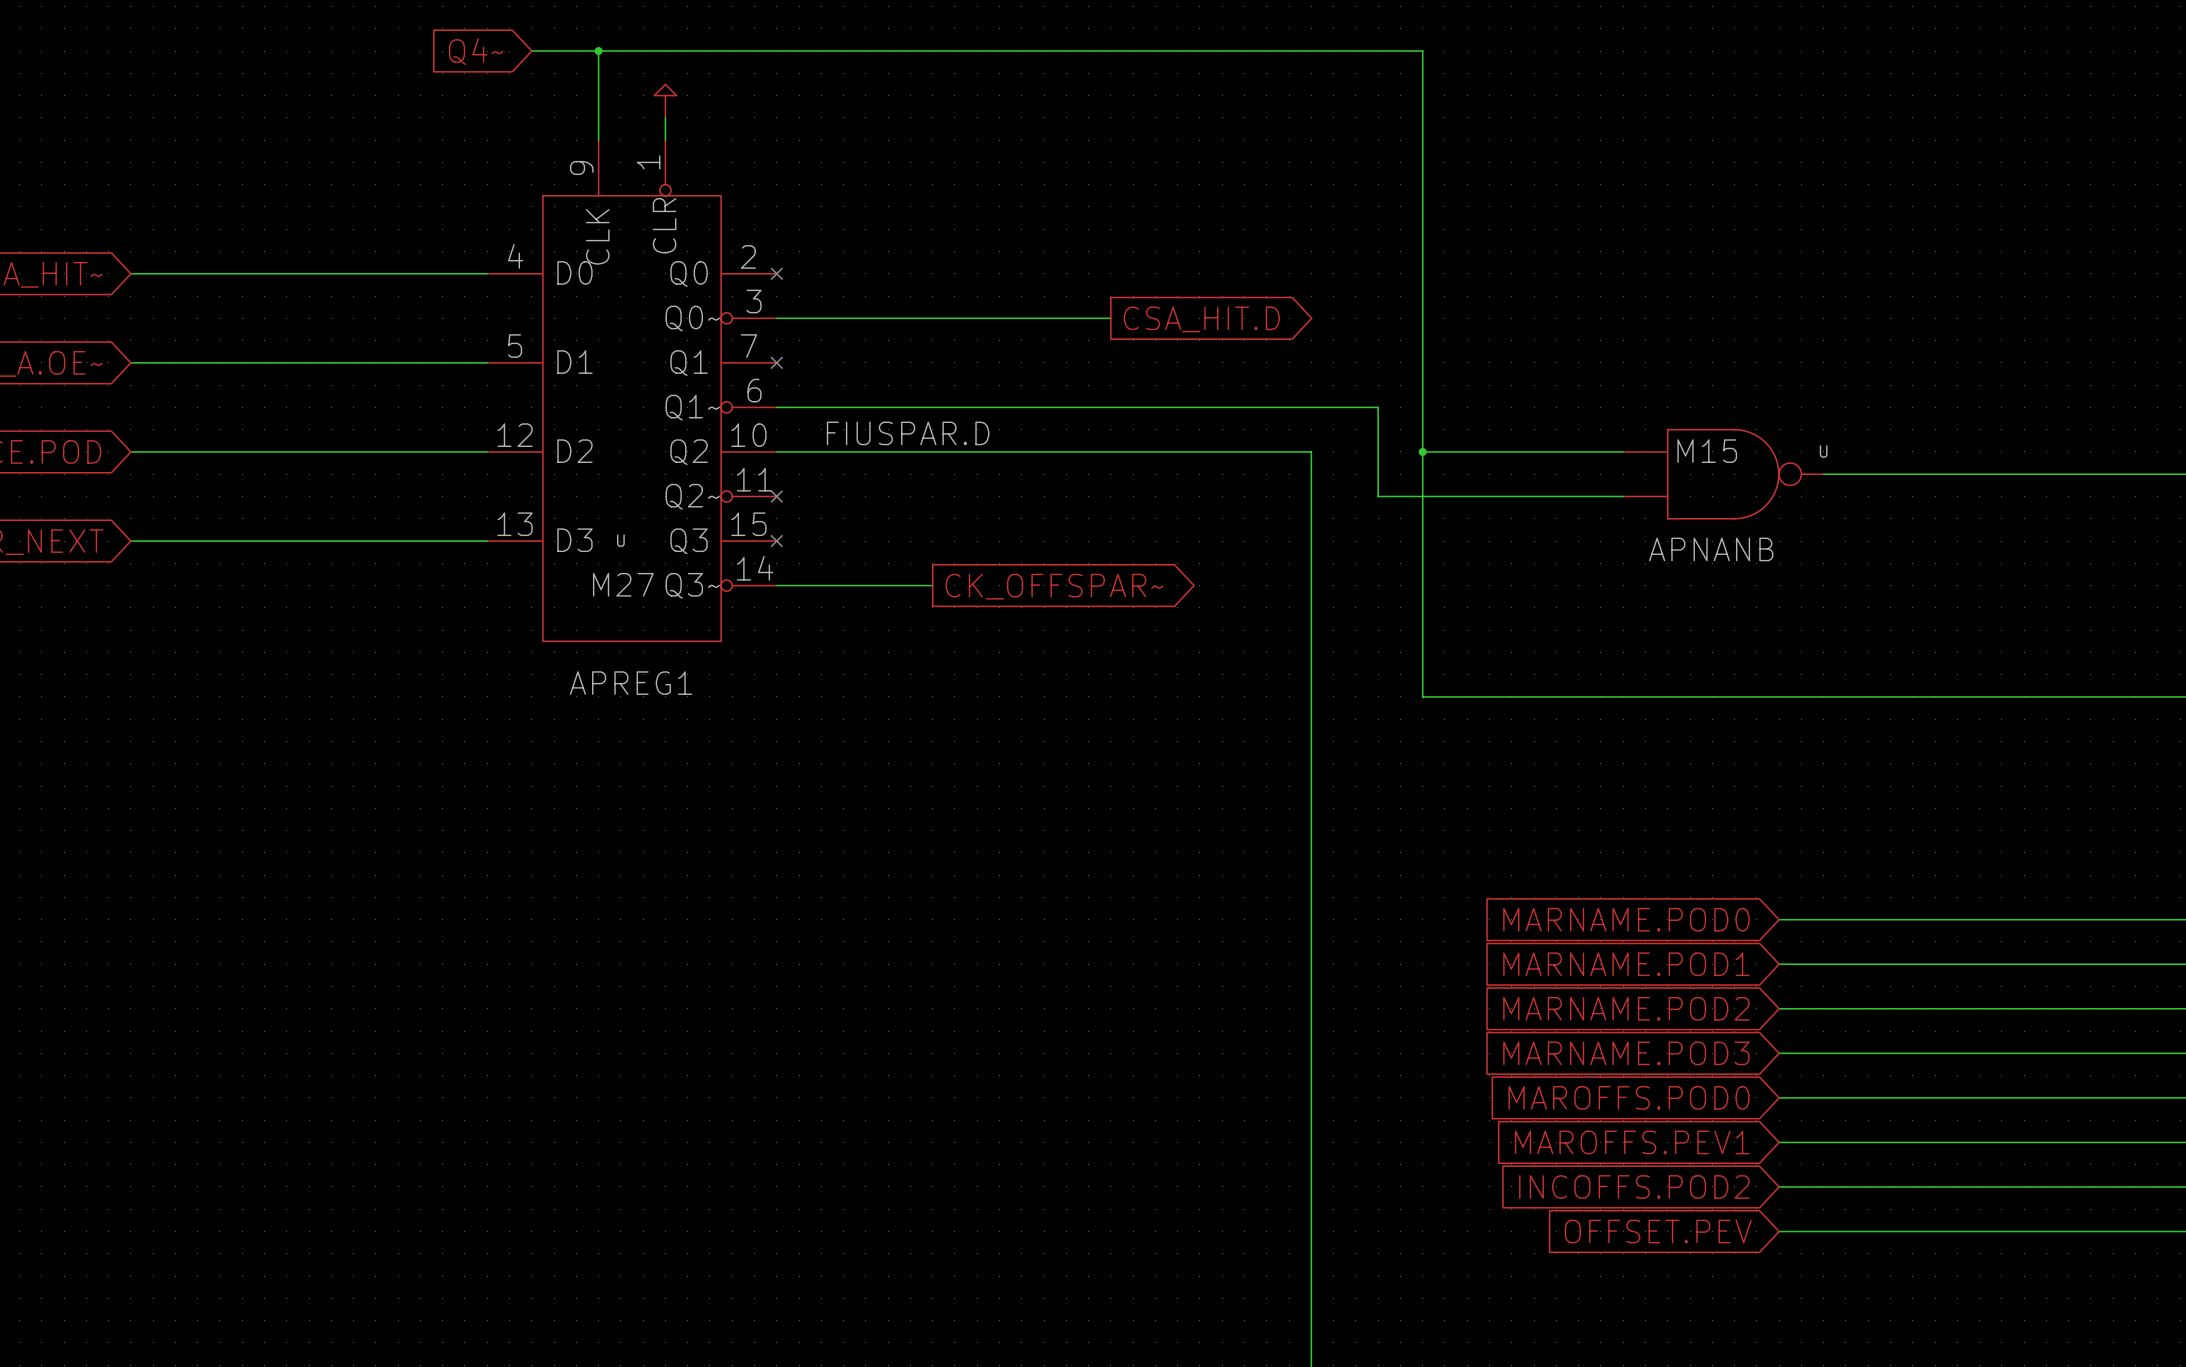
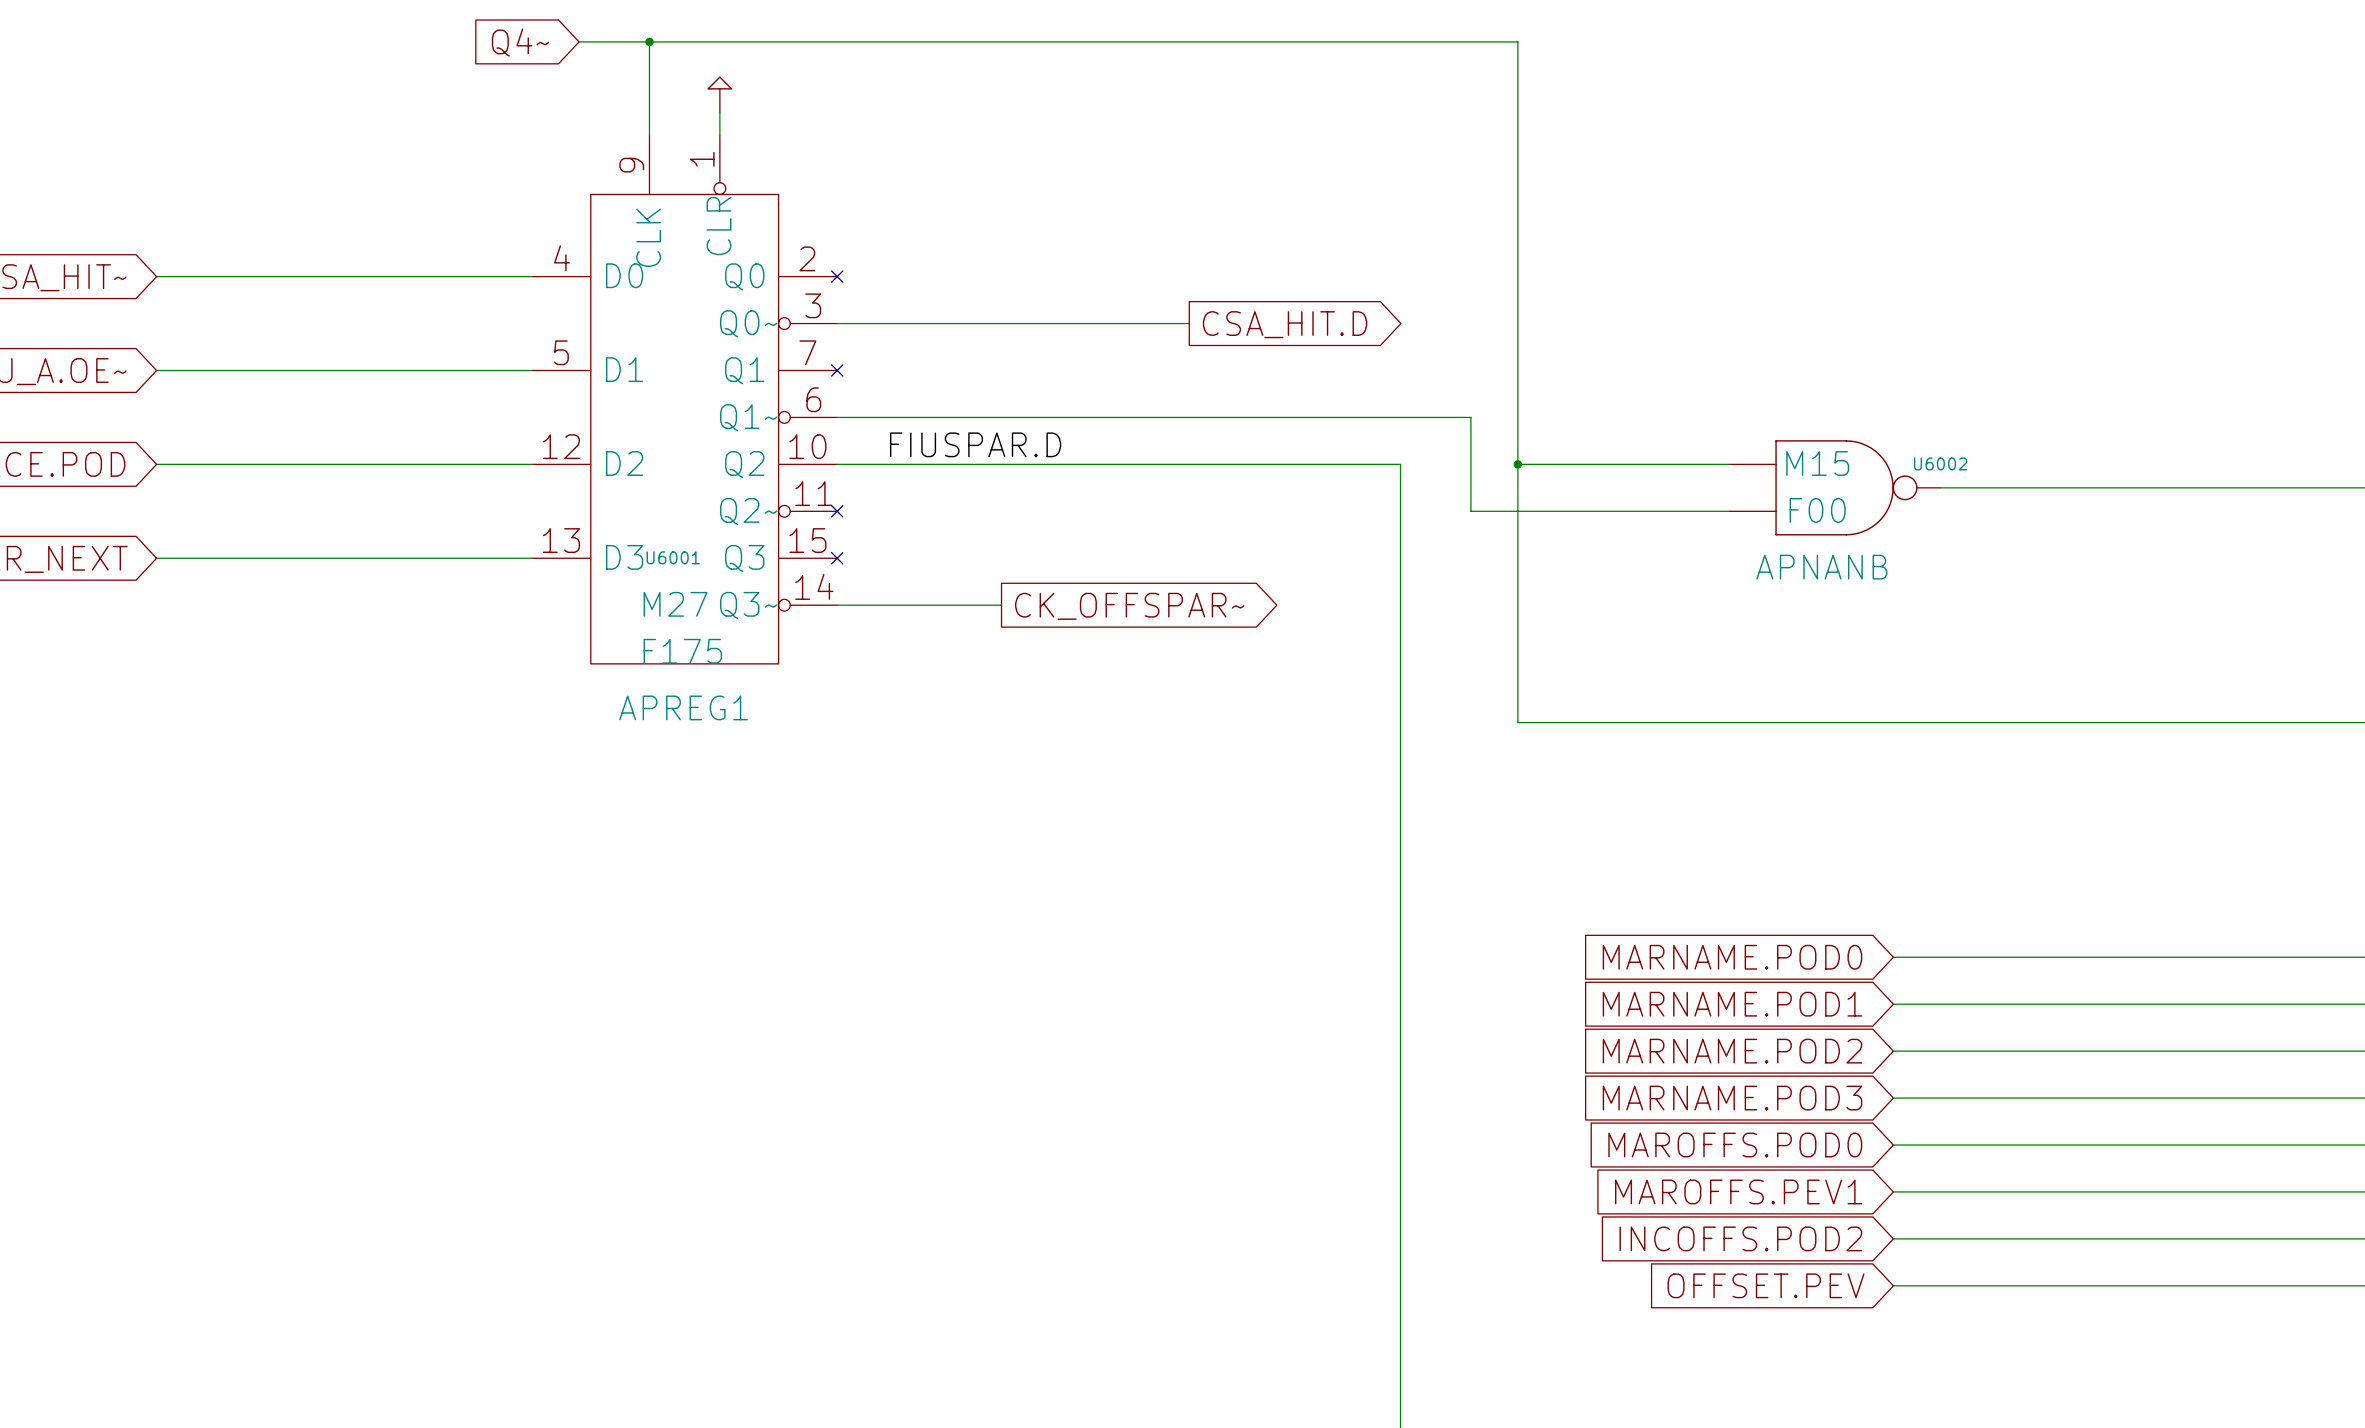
U name: U (1823, 451) -> U6002 (1940, 463)
U value: none -> F00 (1817, 510)
U name: U (620, 540) -> U6001 (673, 557)
U value: none -> F175 (682, 651)

